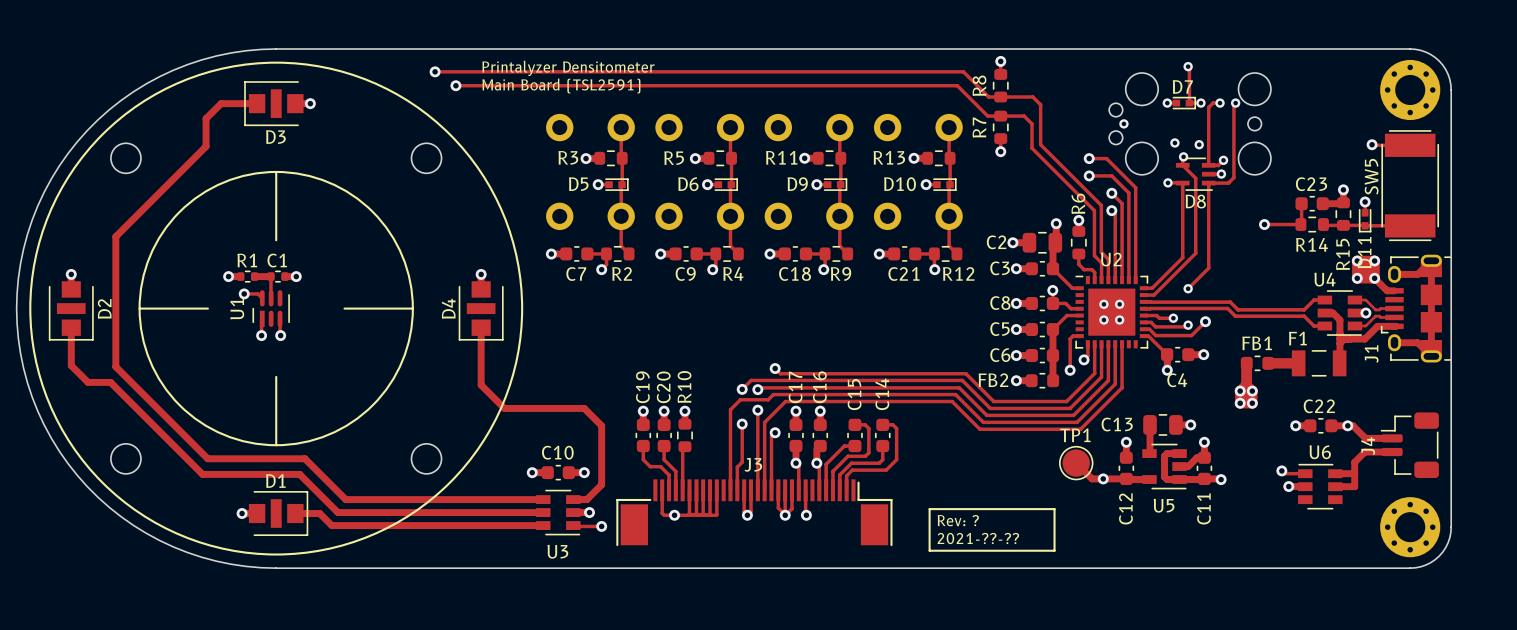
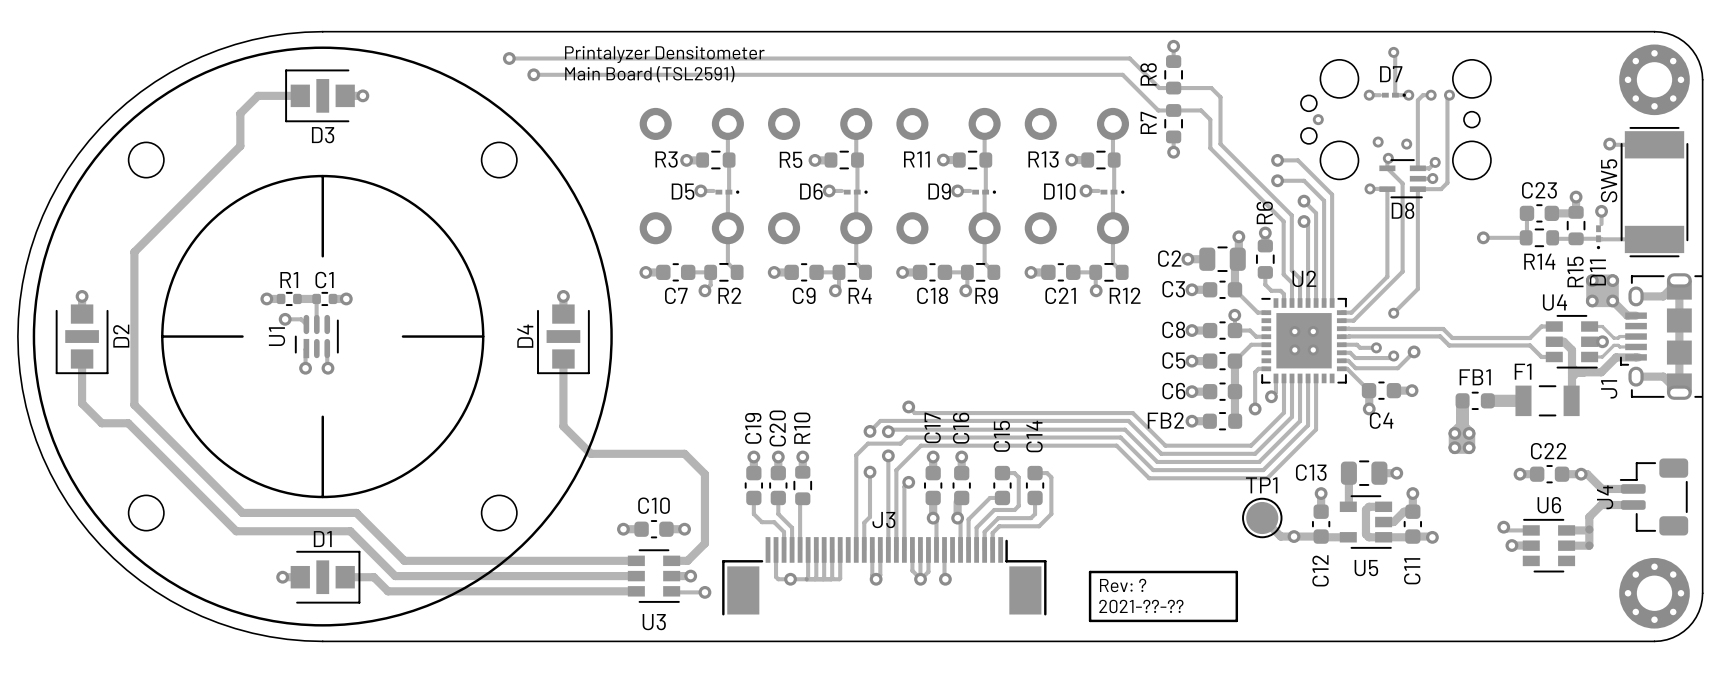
D7 footprint: [1172, 96, 1197, 110] -> [1381, 92, 1406, 98]
D5 footprint: [605, 178, 629, 191] -> [715, 189, 740, 195]
D6 footprint: [714, 178, 738, 191] -> [843, 189, 868, 195]
D9 footprint: [823, 178, 848, 191] -> [972, 189, 997, 195]
D10 footprint: [933, 178, 957, 191] -> [1100, 189, 1125, 195]
D11 footprint: [1358, 208, 1372, 233] -> [1596, 225, 1601, 250]

